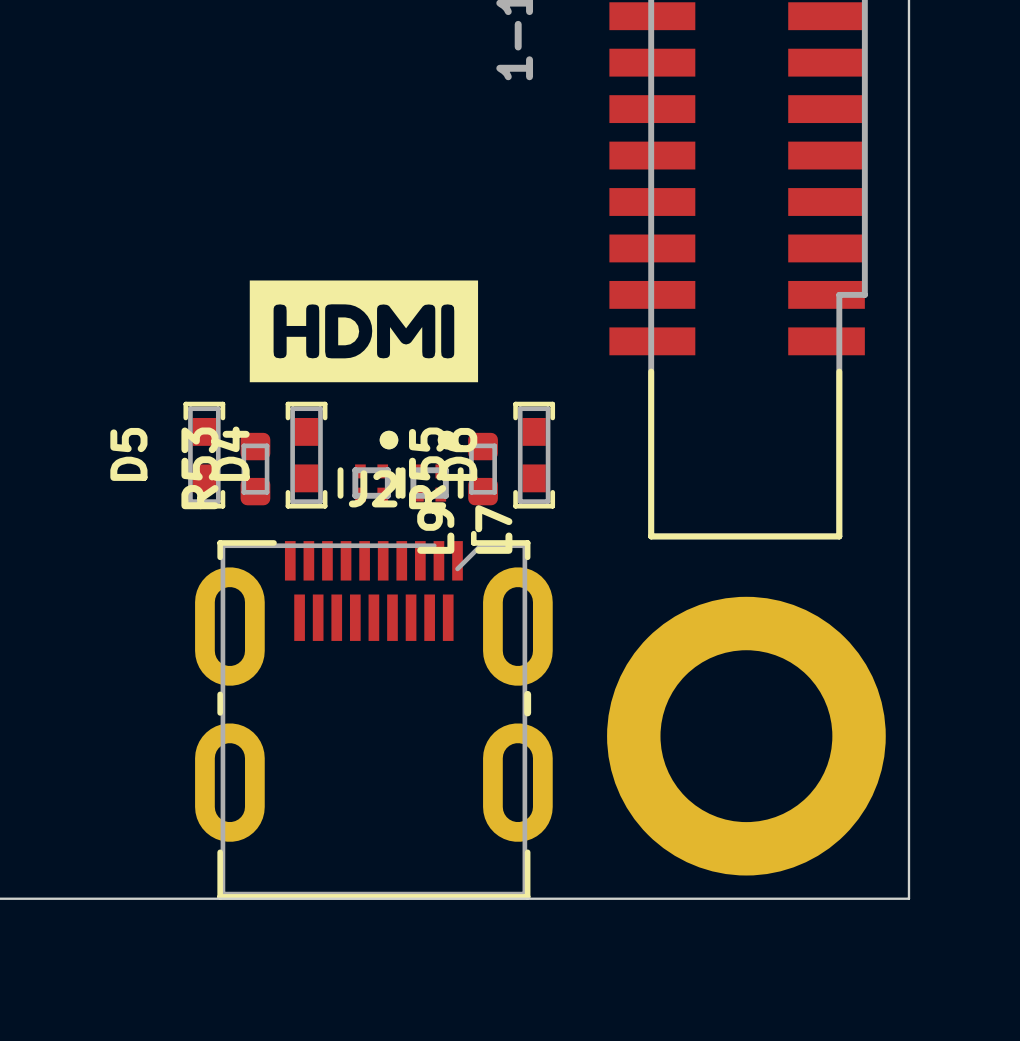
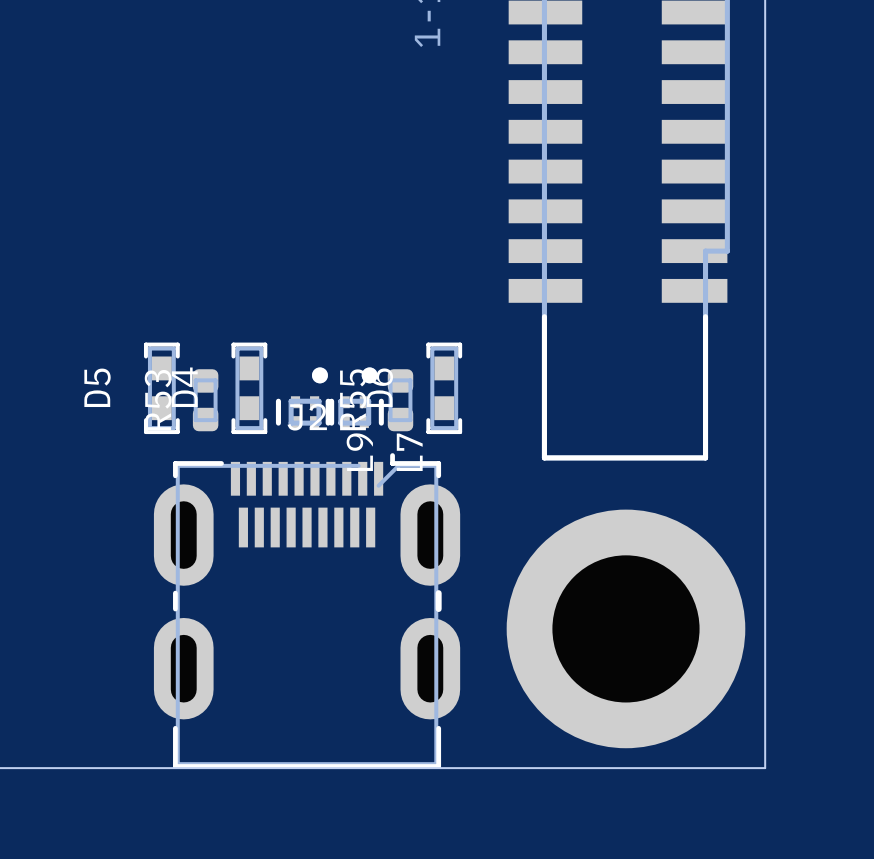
drawing: [249, 280, 479, 383] -> none

